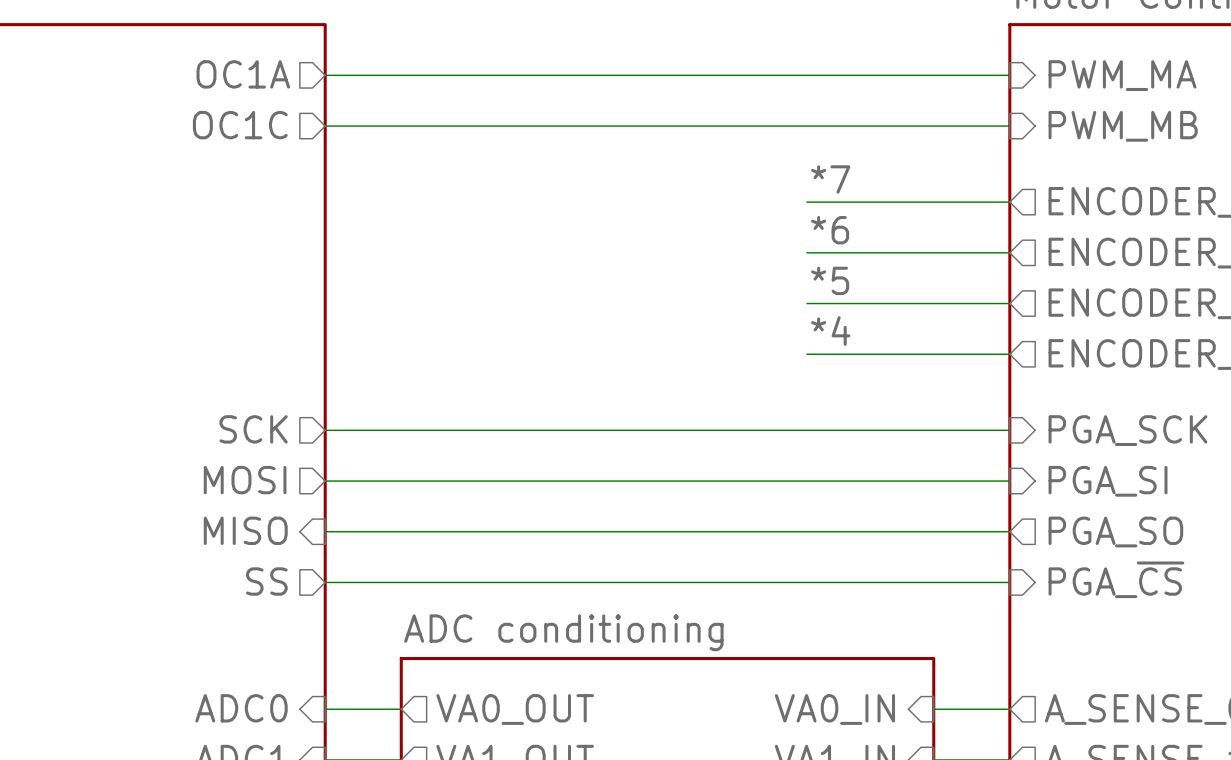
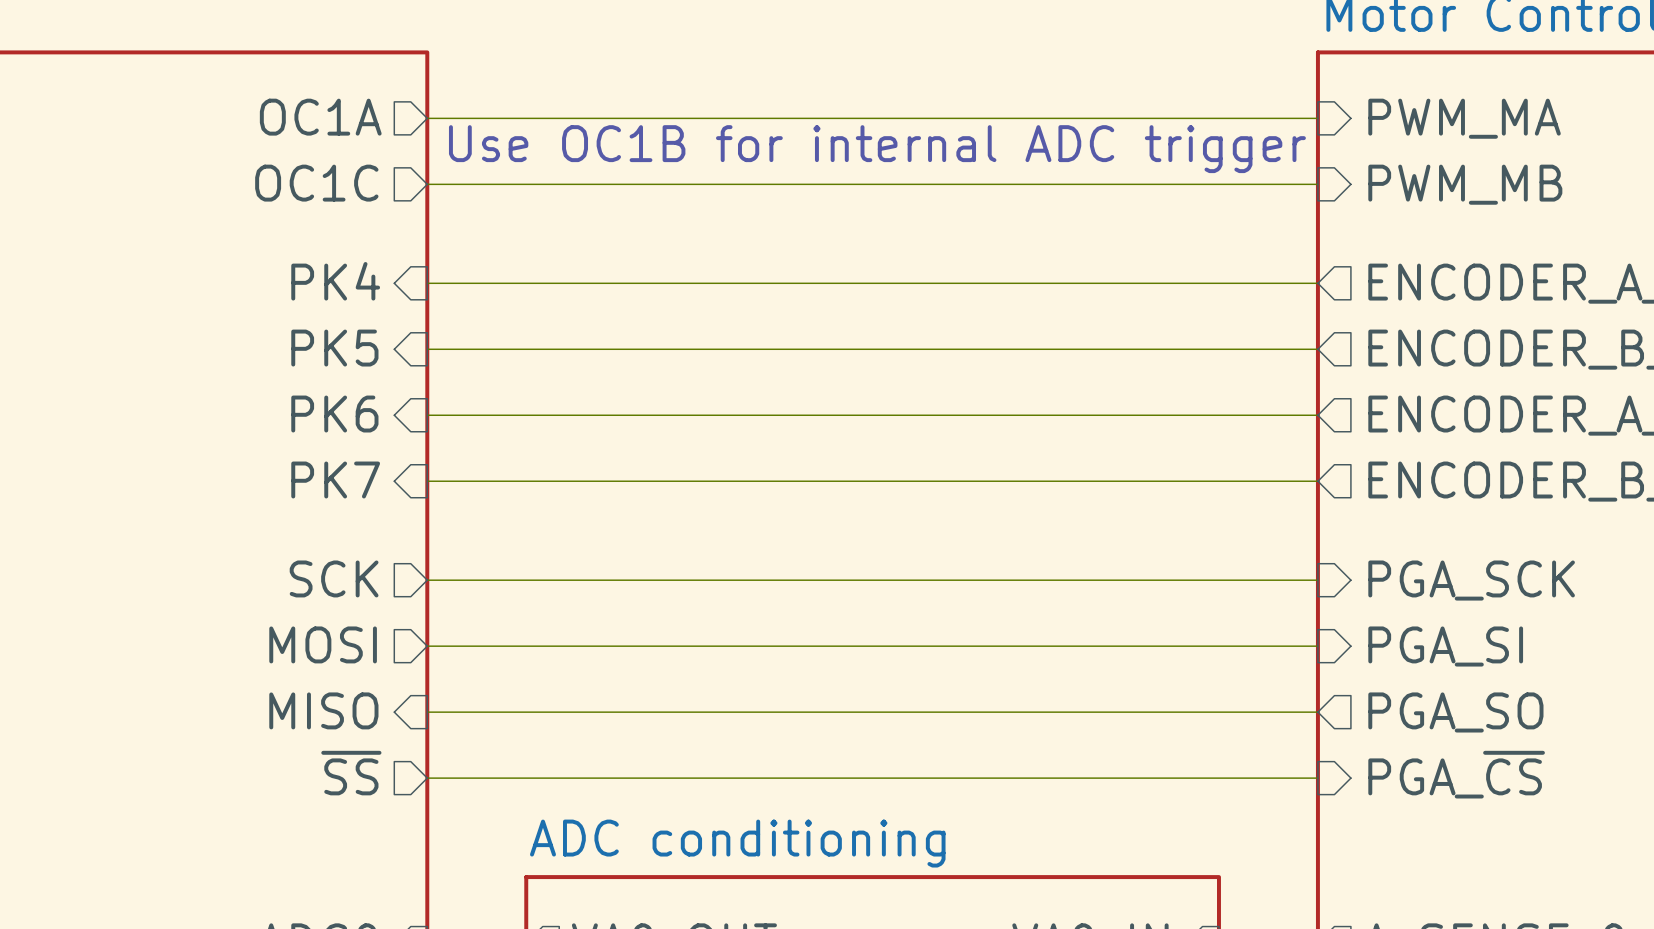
text: none -> Use OC1B for internal ADC trigger (877, 149)
label: *7 (830, 179) -> none
sheet pin: none -> PK4 (335, 281)
wire: none -> (427, 283) (1054, 283)
label: *6 (830, 230) -> none
sheet pin: none -> PK5 (334, 348)
wire: none -> (427, 349) (1054, 349)
label: *5 (830, 280) -> none
sheet pin: none -> PK6 (334, 414)
wire: none -> (427, 415) (1054, 415)
label: *4 (830, 331) -> none
sheet pin: none -> PK7 (335, 479)
wire: none -> (427, 481) (1054, 481)
sheet pin: SS (266, 581) -> ~{SS} (351, 773)

